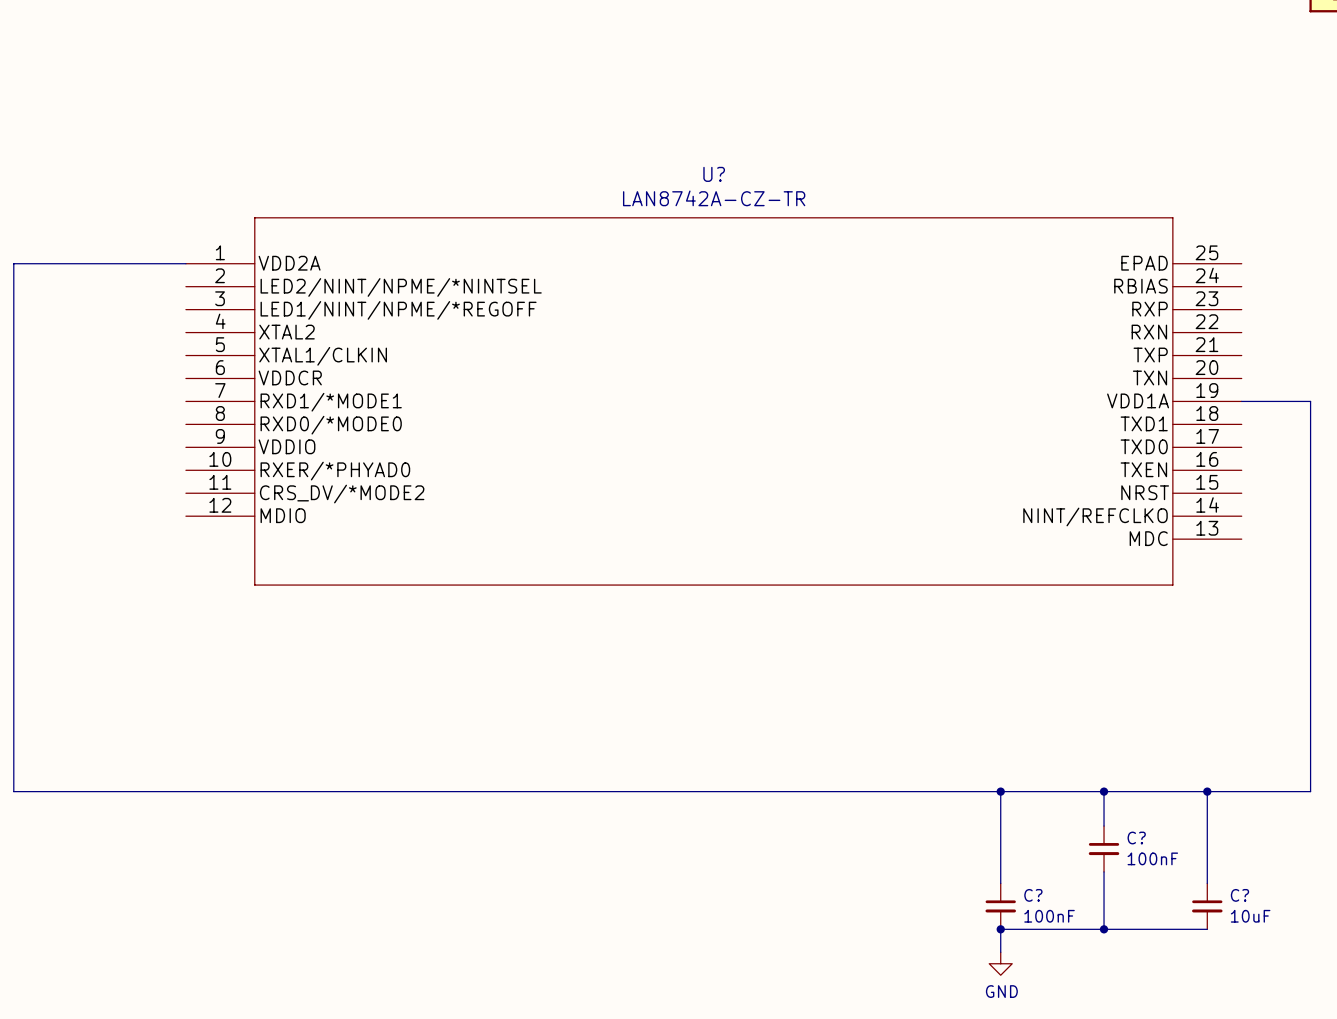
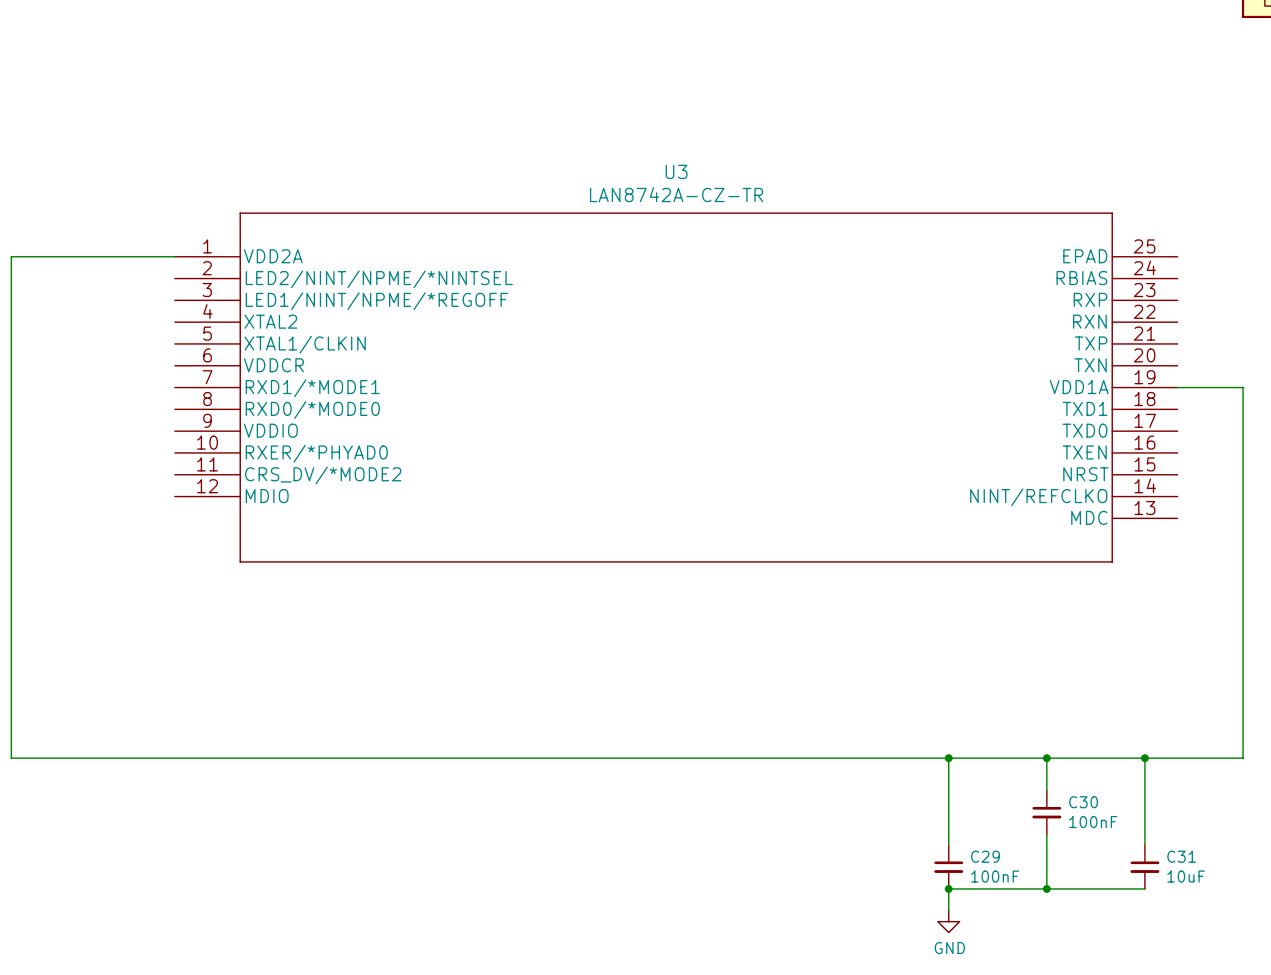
U? name: U? (714, 174) -> U3 (676, 171)
C? name: C? (1136, 838) -> C30 (1083, 802)
C? name: C? (1033, 895) -> C29 (985, 856)
C? name: C? (1239, 895) -> C31 (1181, 856)

